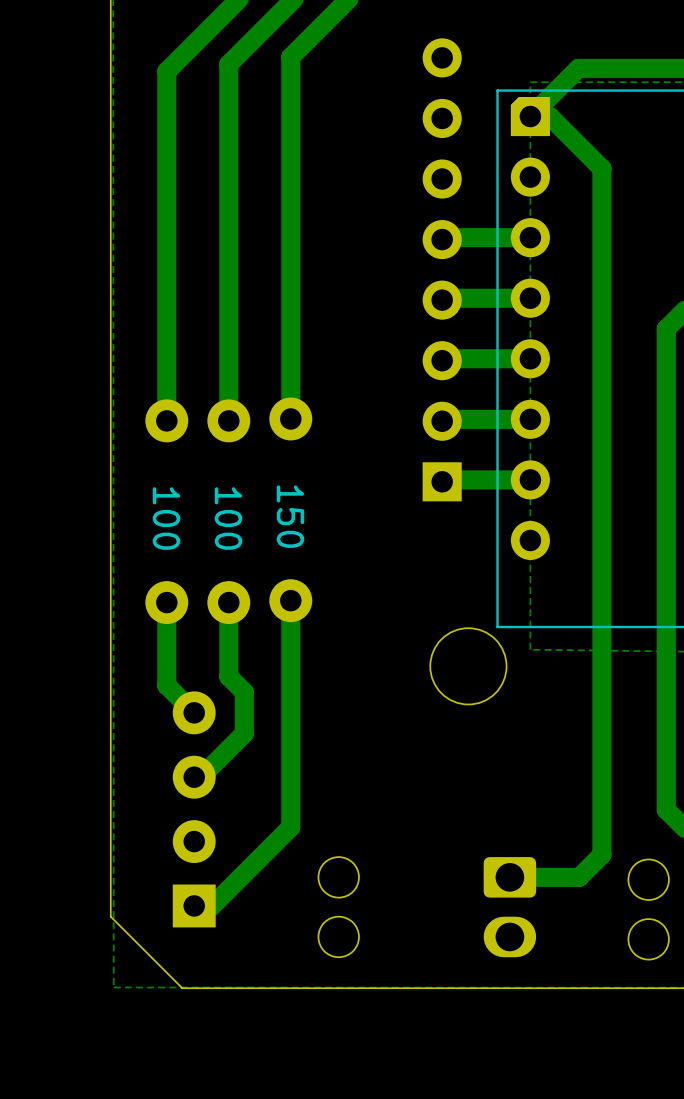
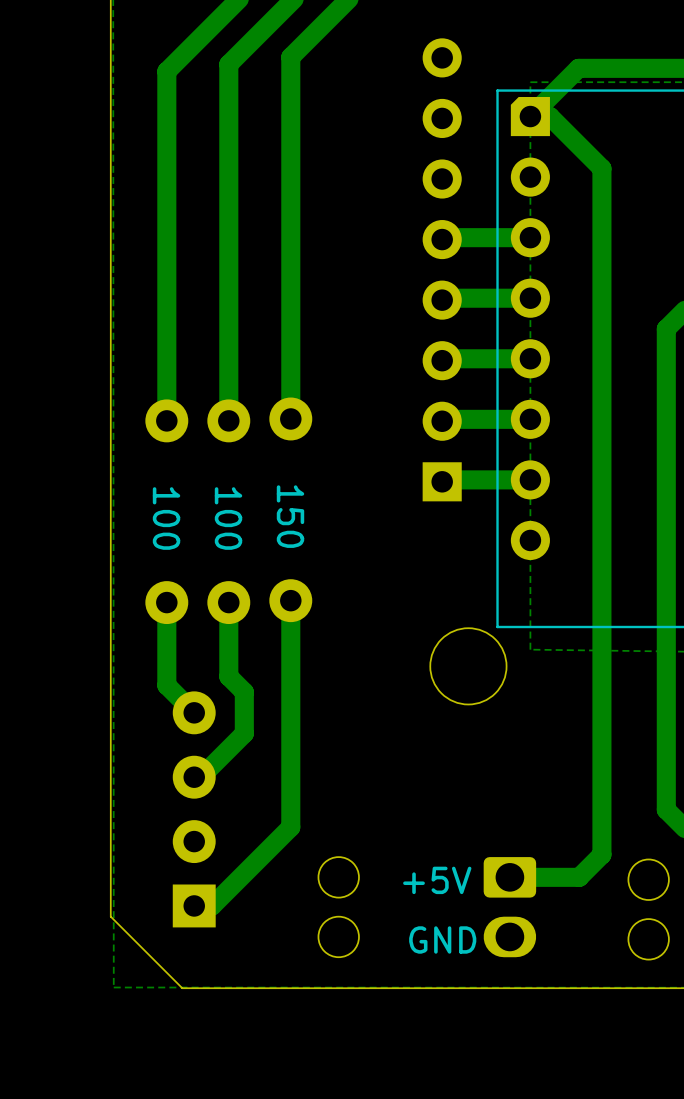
text: none -> +5V (437, 880)
text: none -> GND (442, 939)

